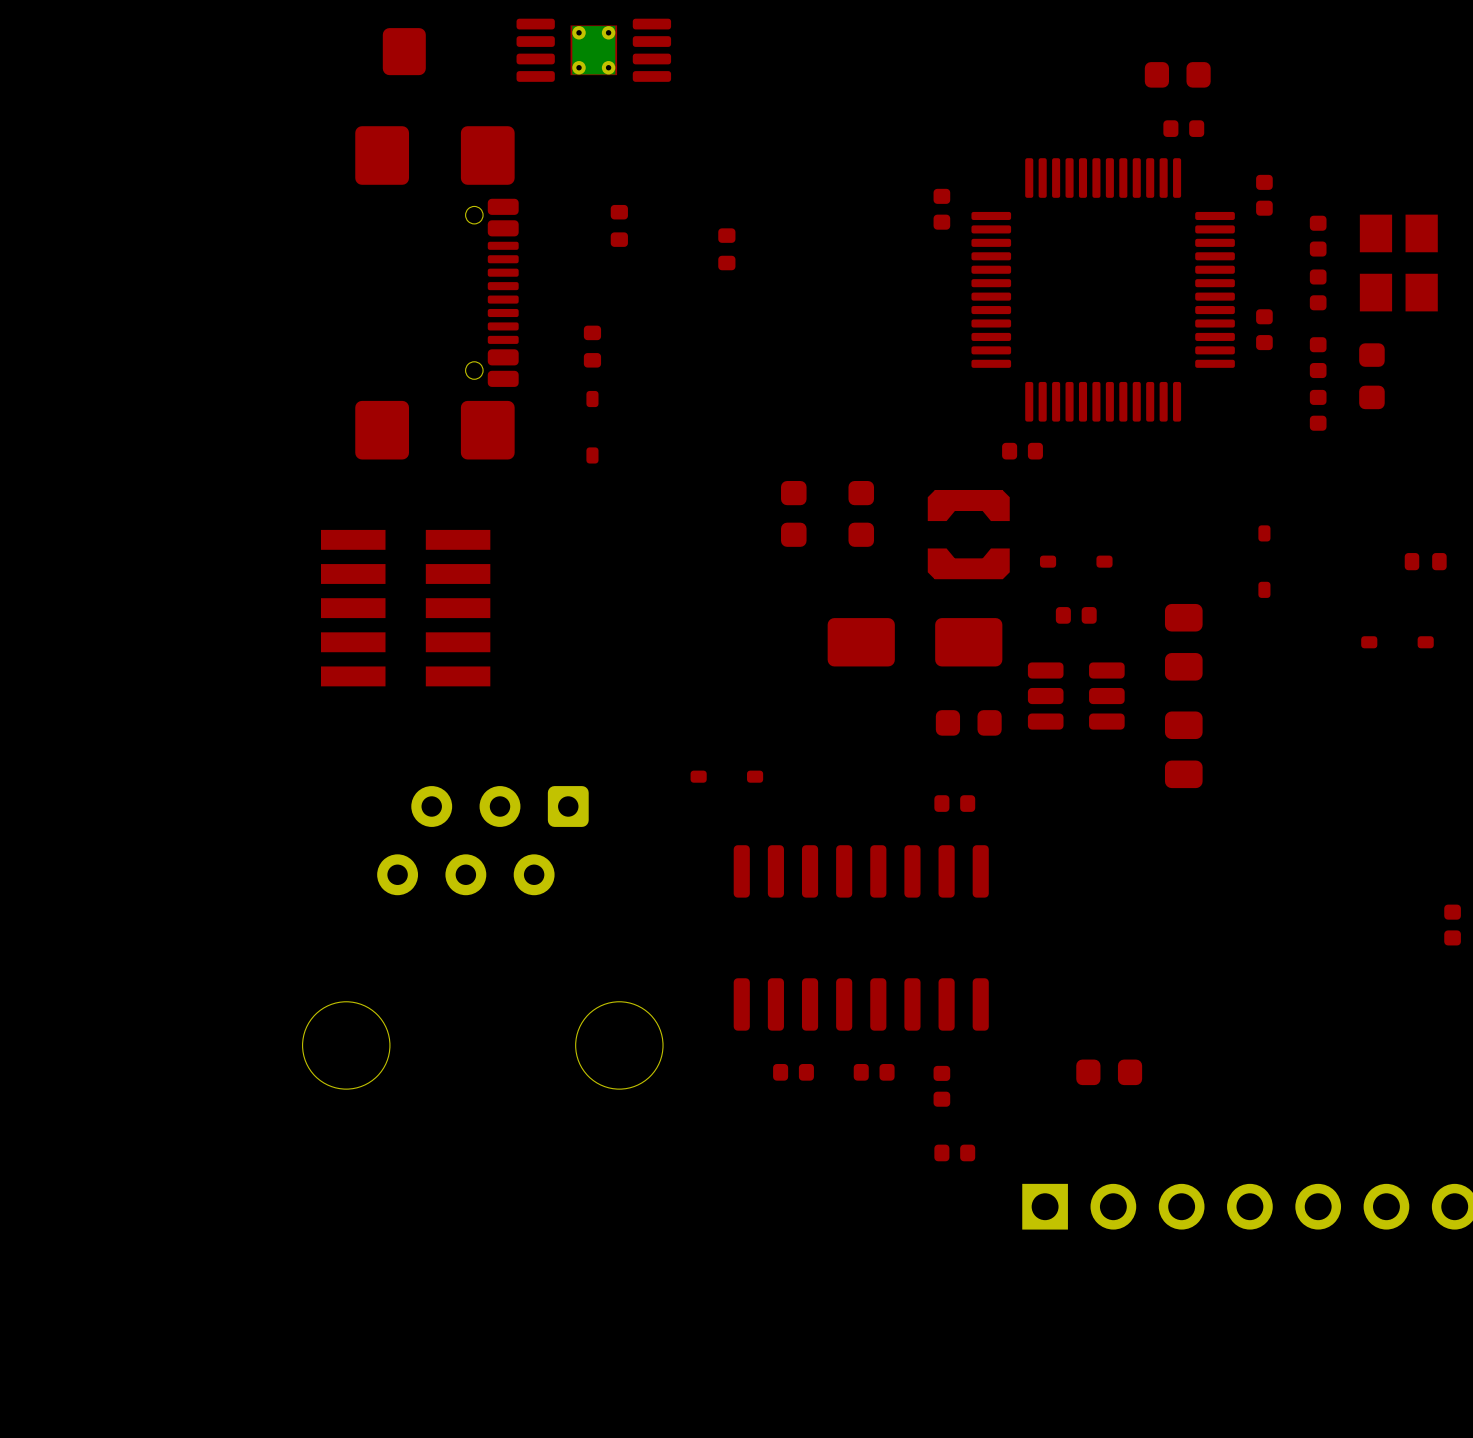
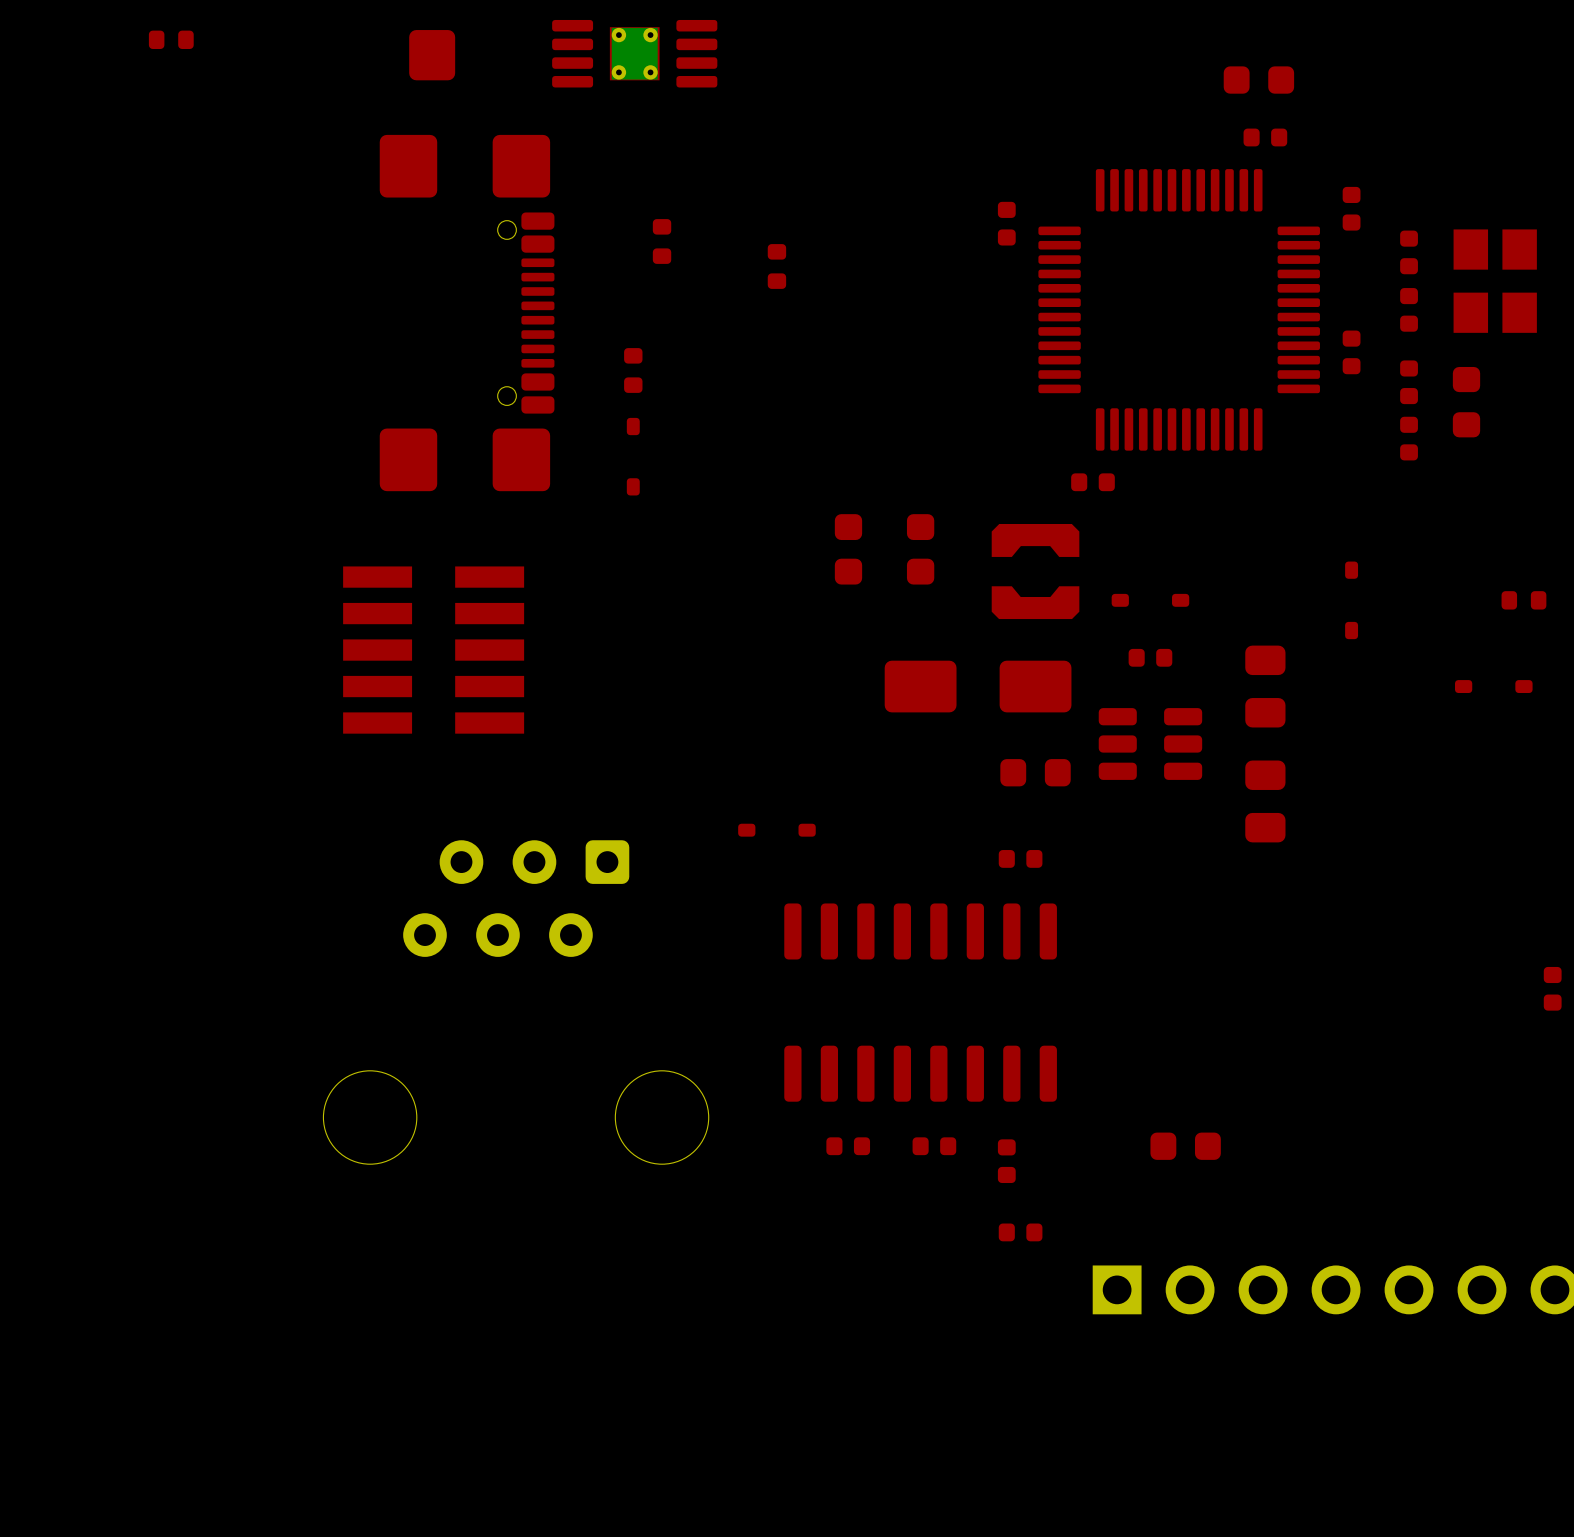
part: none -> (171, 39)

